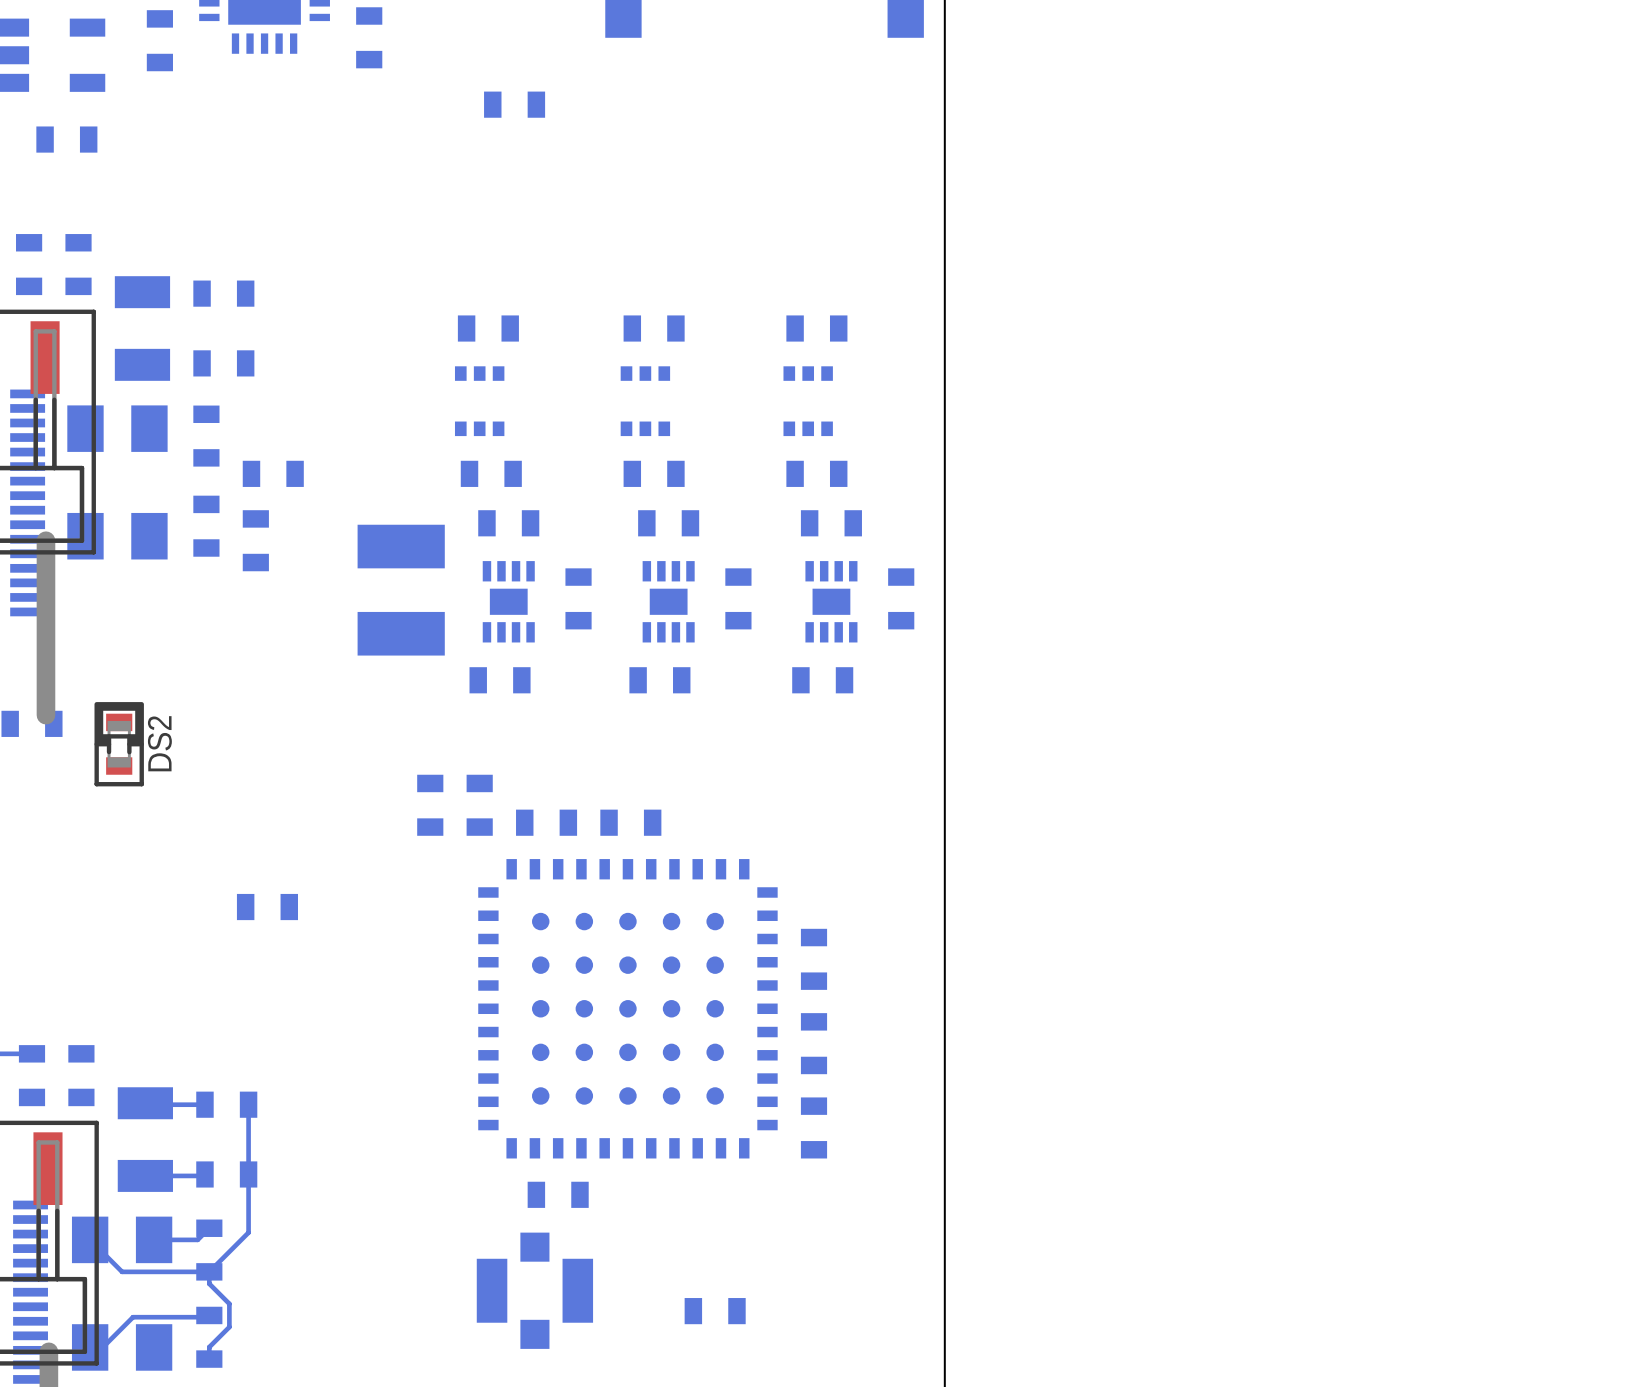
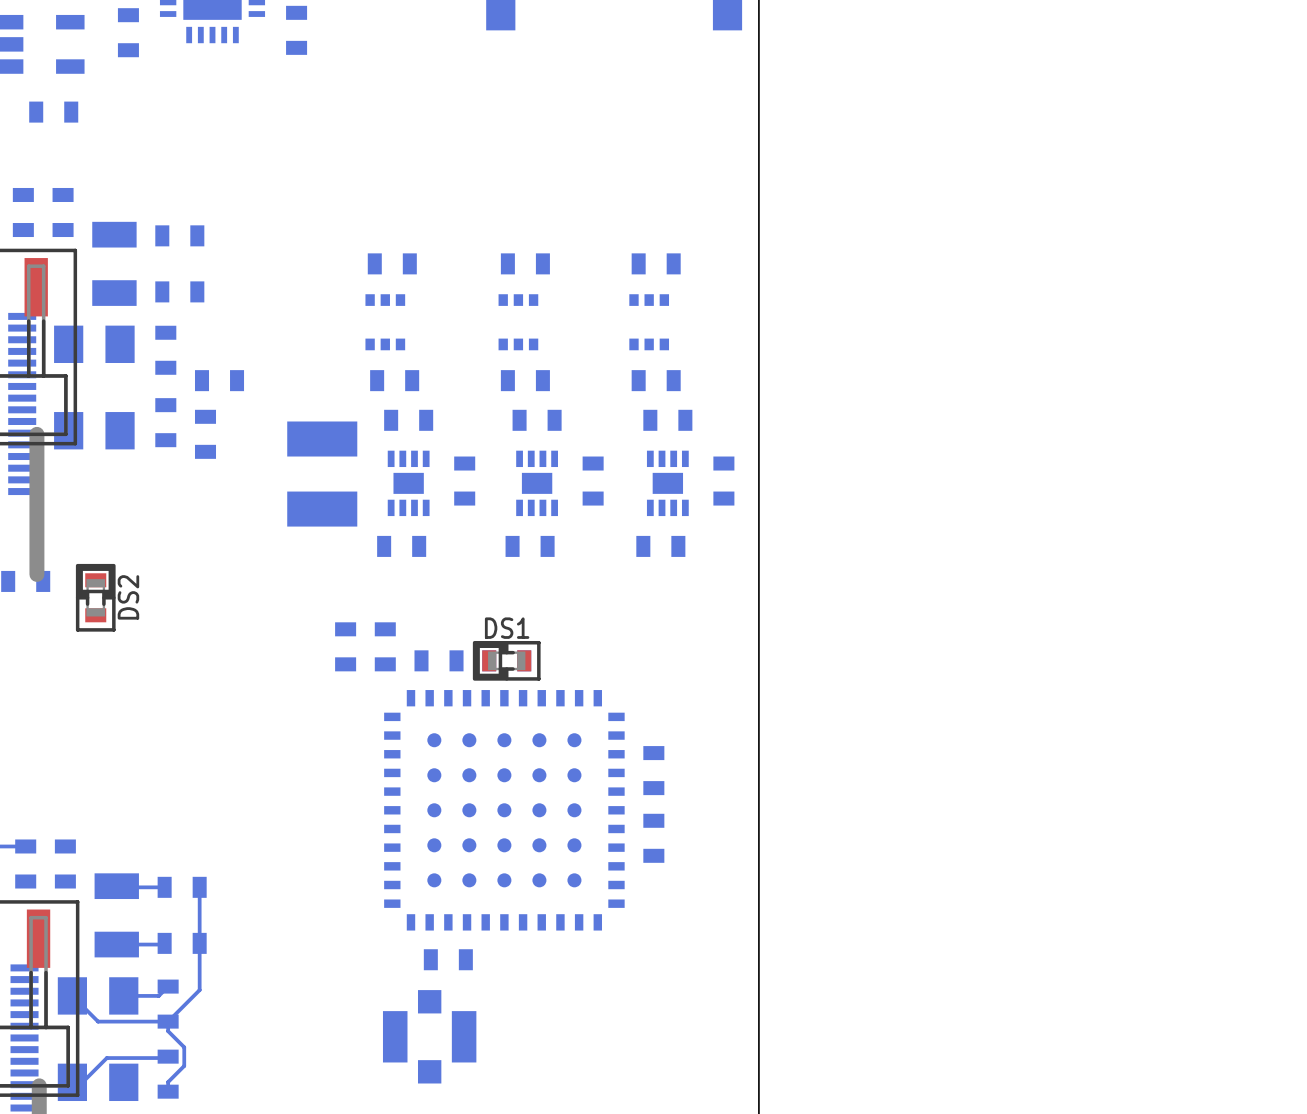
part: (514, 104) -> none
DS1: none -> (506, 660)
part: (267, 907) -> none
part: (814, 1127) -> none
part: (715, 1311) -> none

